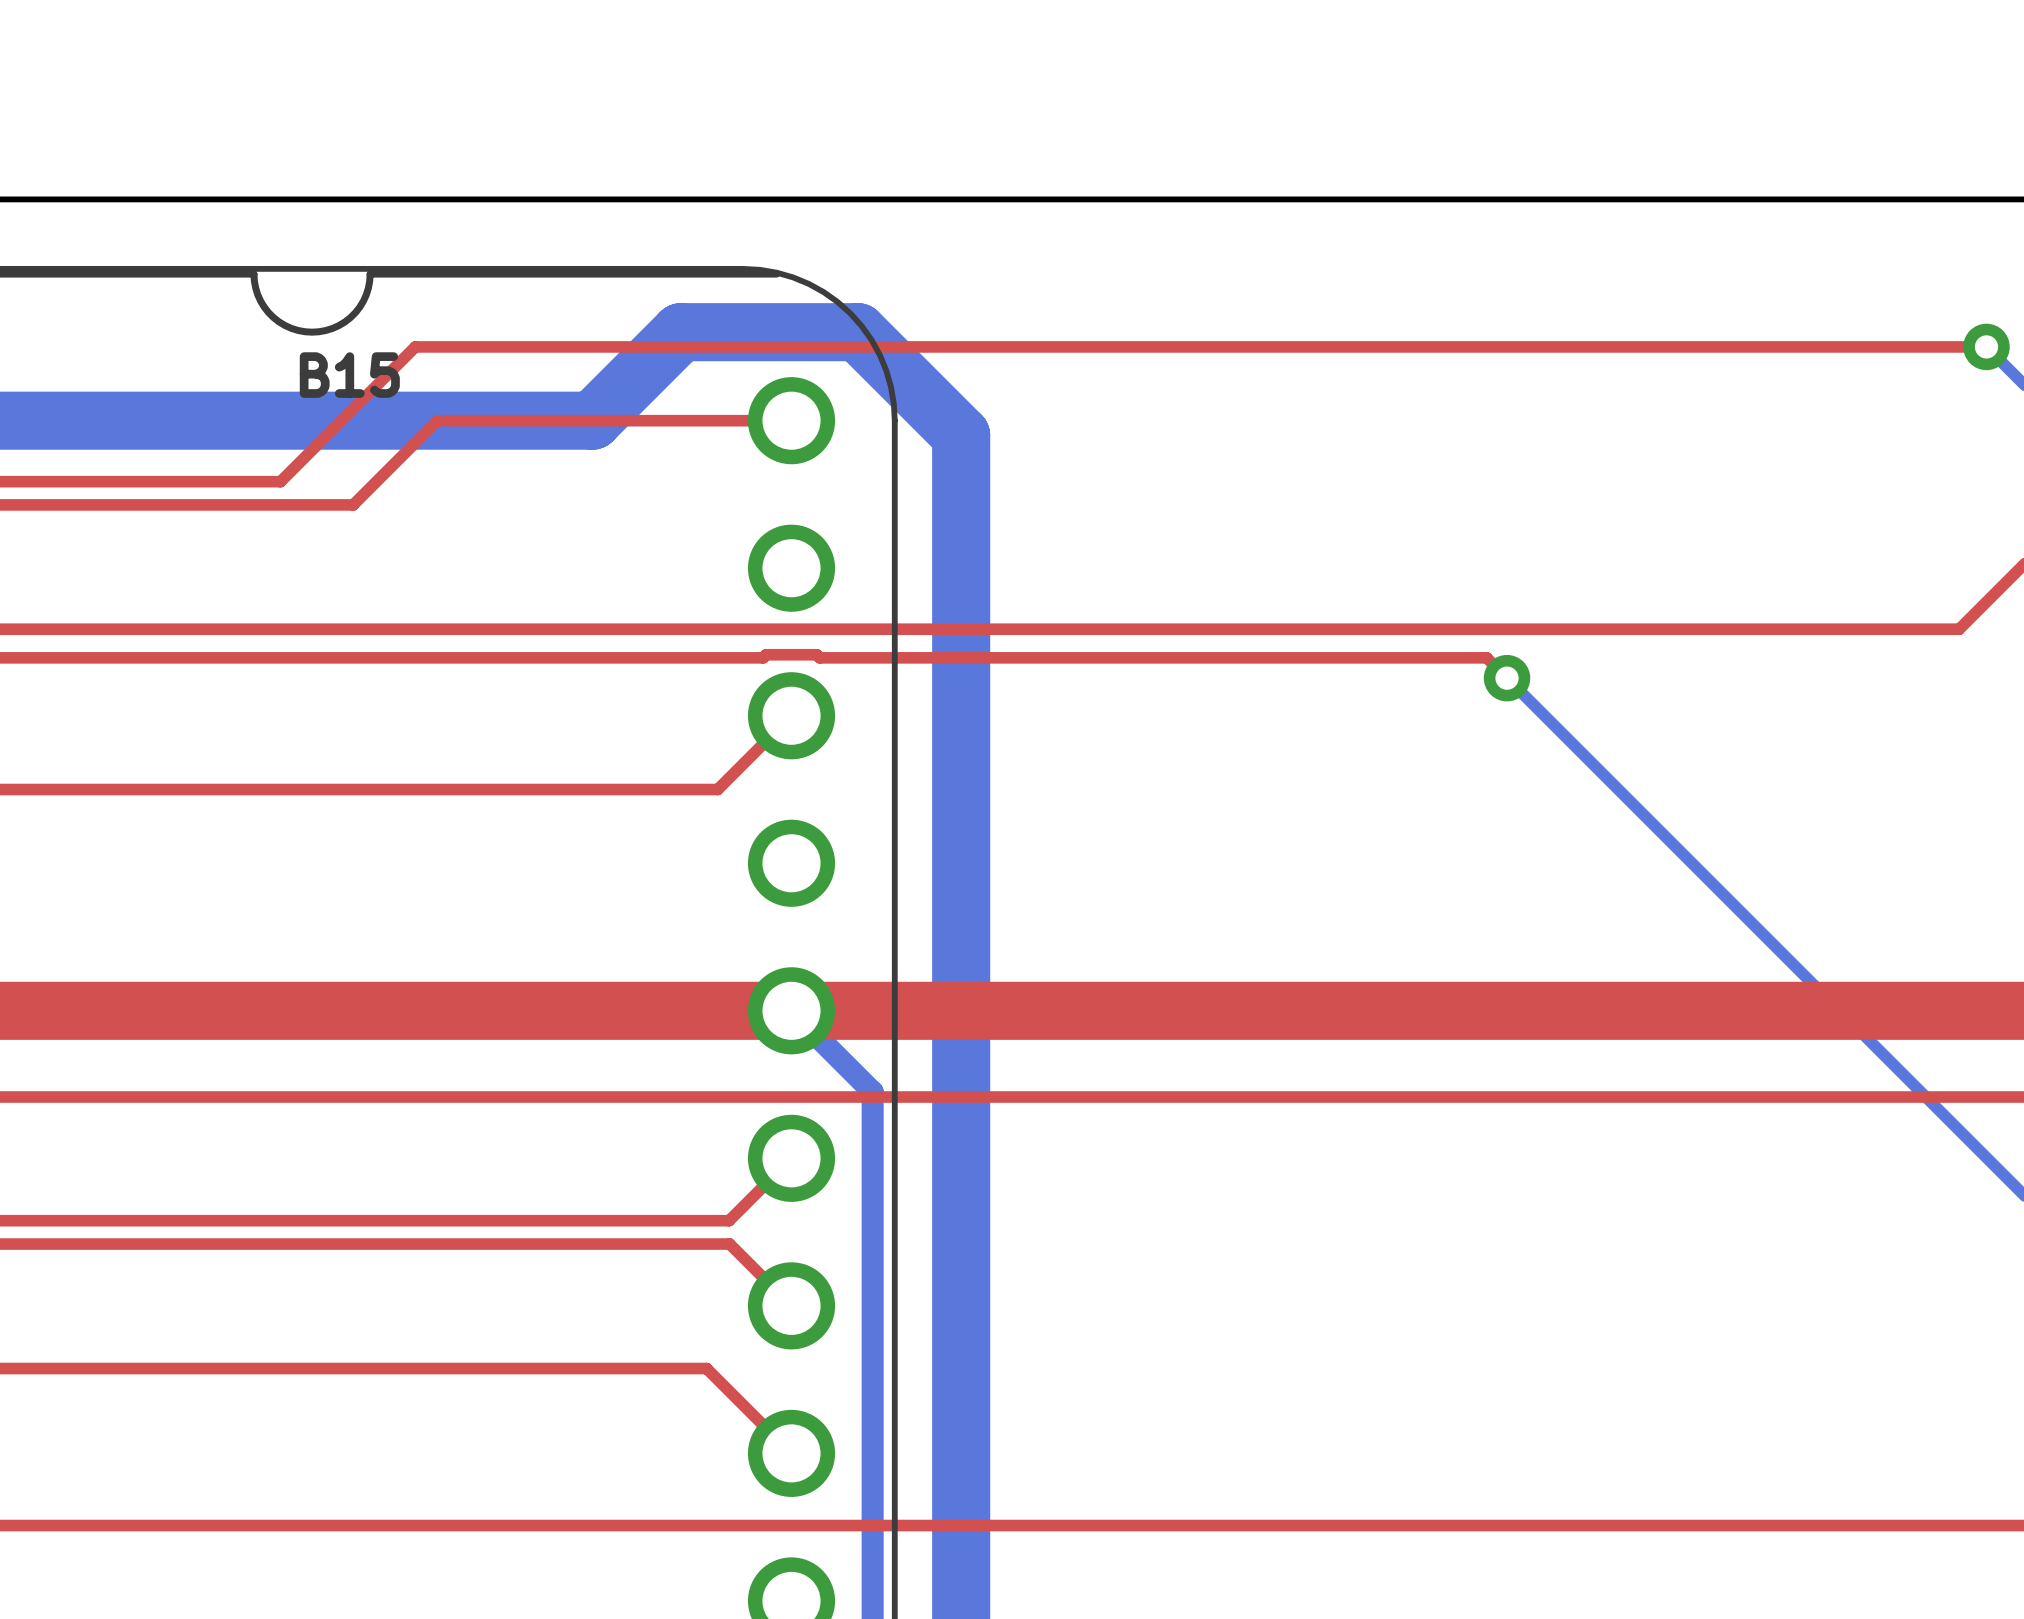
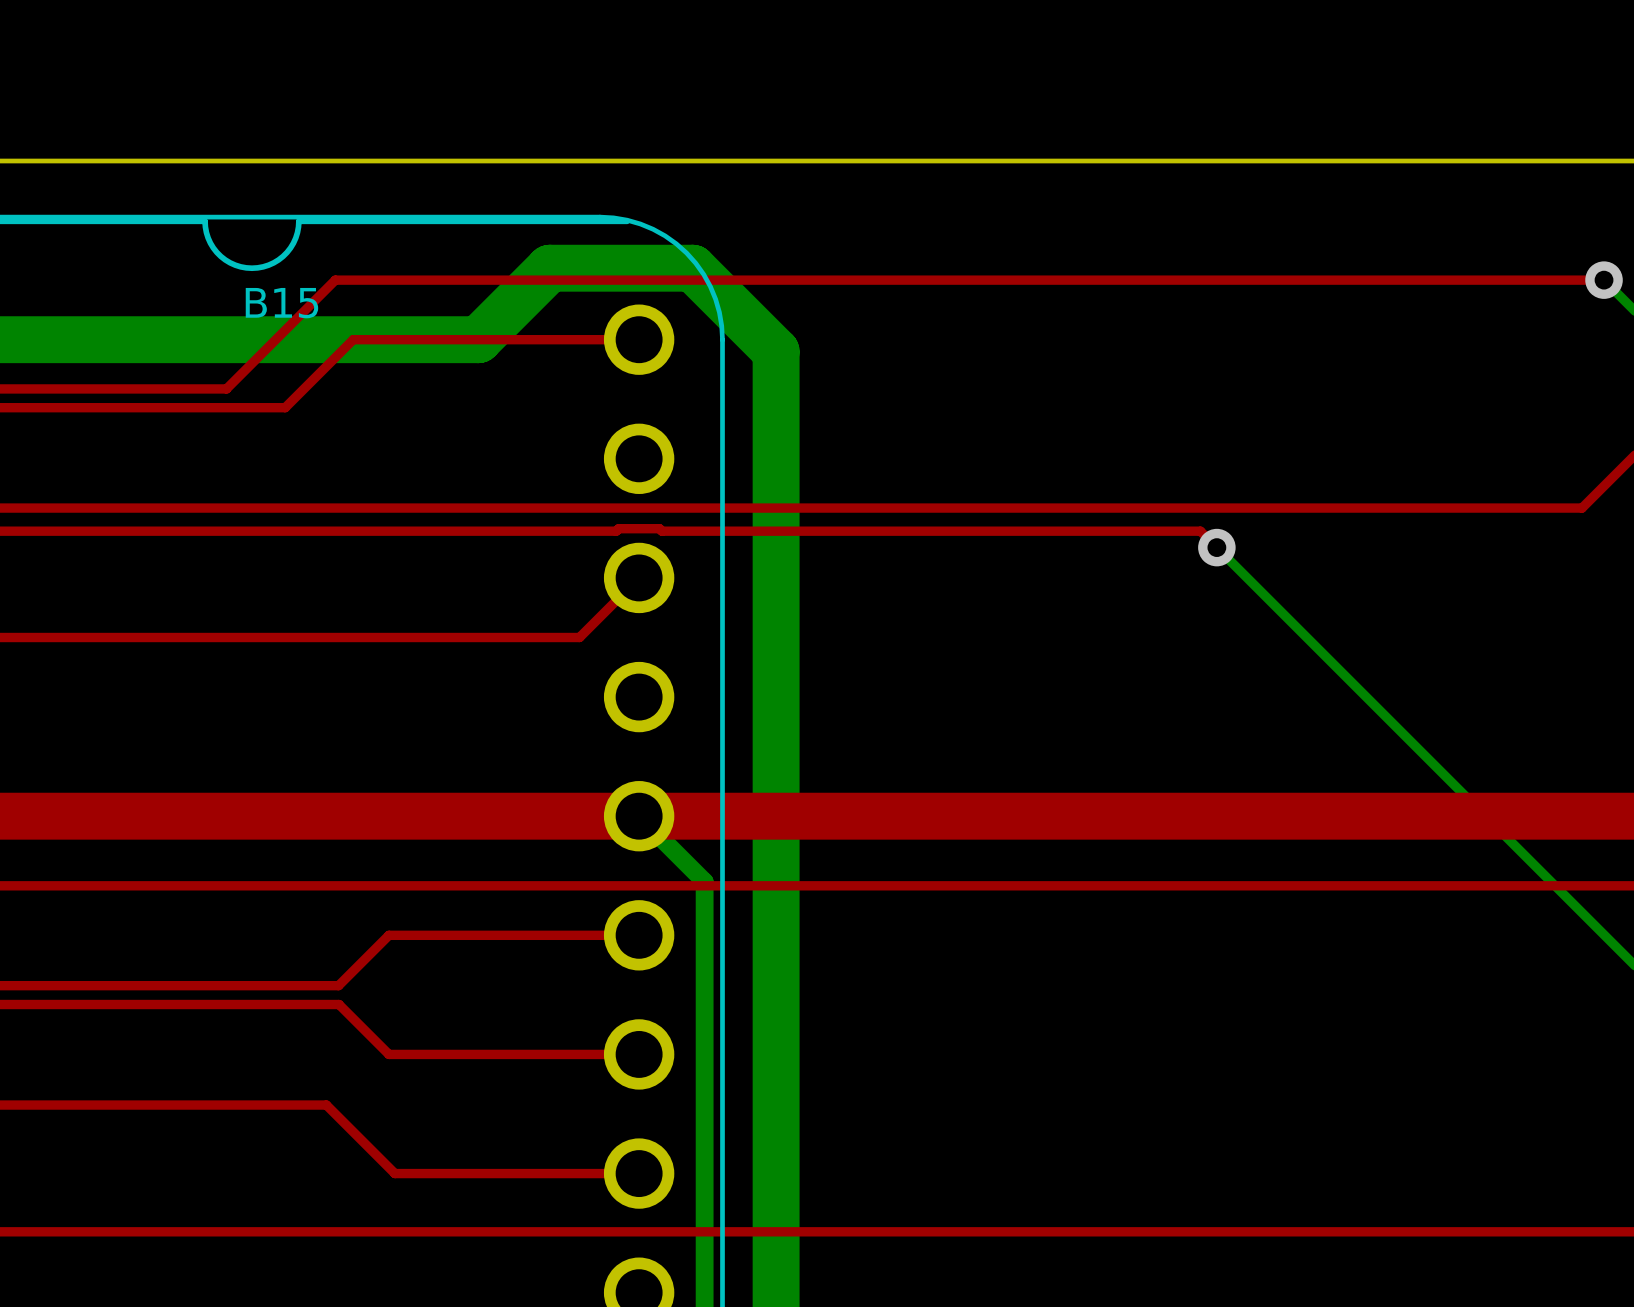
top track: (791, 1158) (729, 1220) (419, 1220) -> (639, 935) (388, 935) (338, 985)
top track: (419, 1244) (729, 1244) (791, 1305) -> (339, 1004) (388, 1054) (639, 1054)
top track: (404, 1368) (706, 1368) (791, 1453) -> (326, 1105) (394, 1173) (639, 1173)

